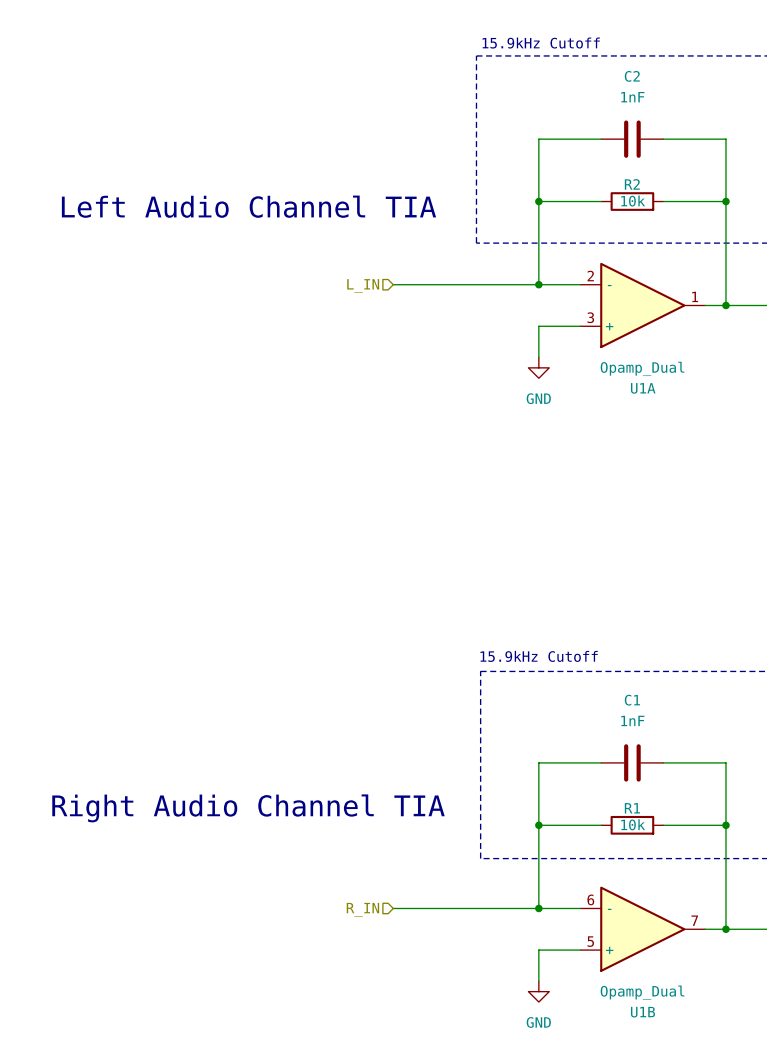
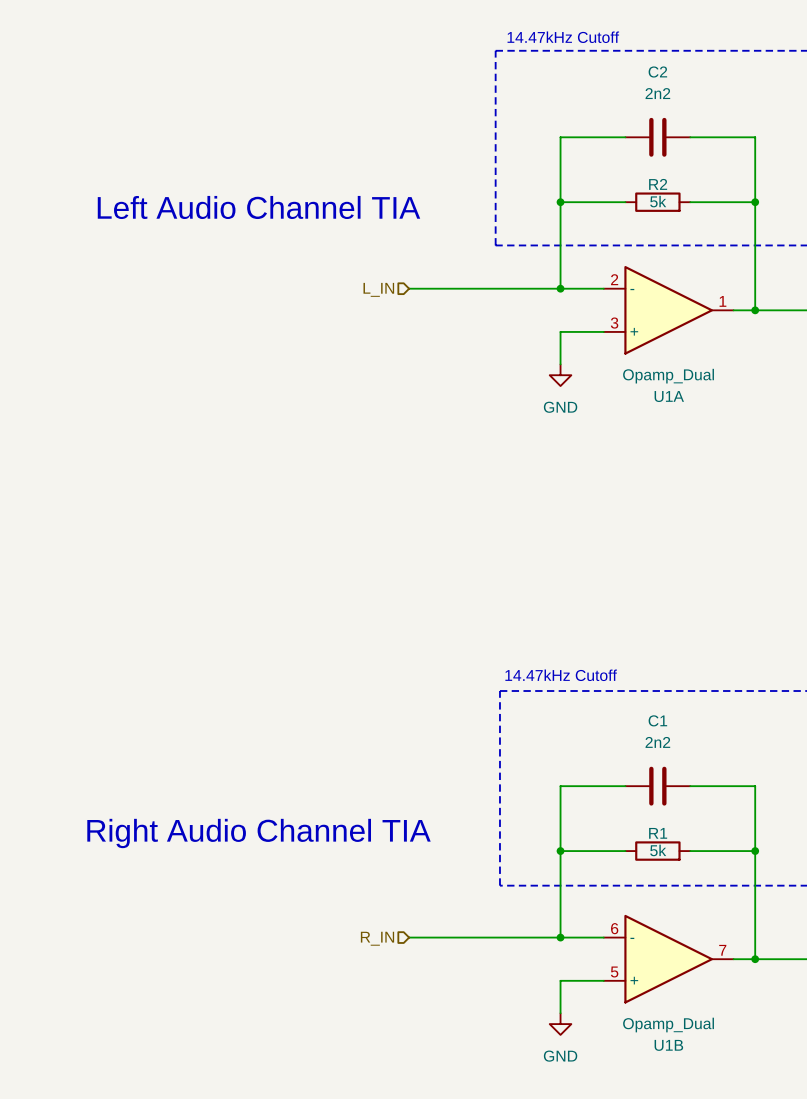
text: 15.9kHz Cutoff (541, 43) -> 14.47kHz Cutoff (563, 37)
C2 value: 1nF (632, 97) -> 2n2 (657, 93)
R2 value: 10k (633, 201) -> 5k (658, 201)
text: 15.9kHz Cutoff (539, 656) -> 14.47kHz Cutoff (561, 675)
C1 value: 1nF (632, 720) -> 2n2 (657, 742)
R1 value: 10k (633, 824) -> 5k (658, 850)

